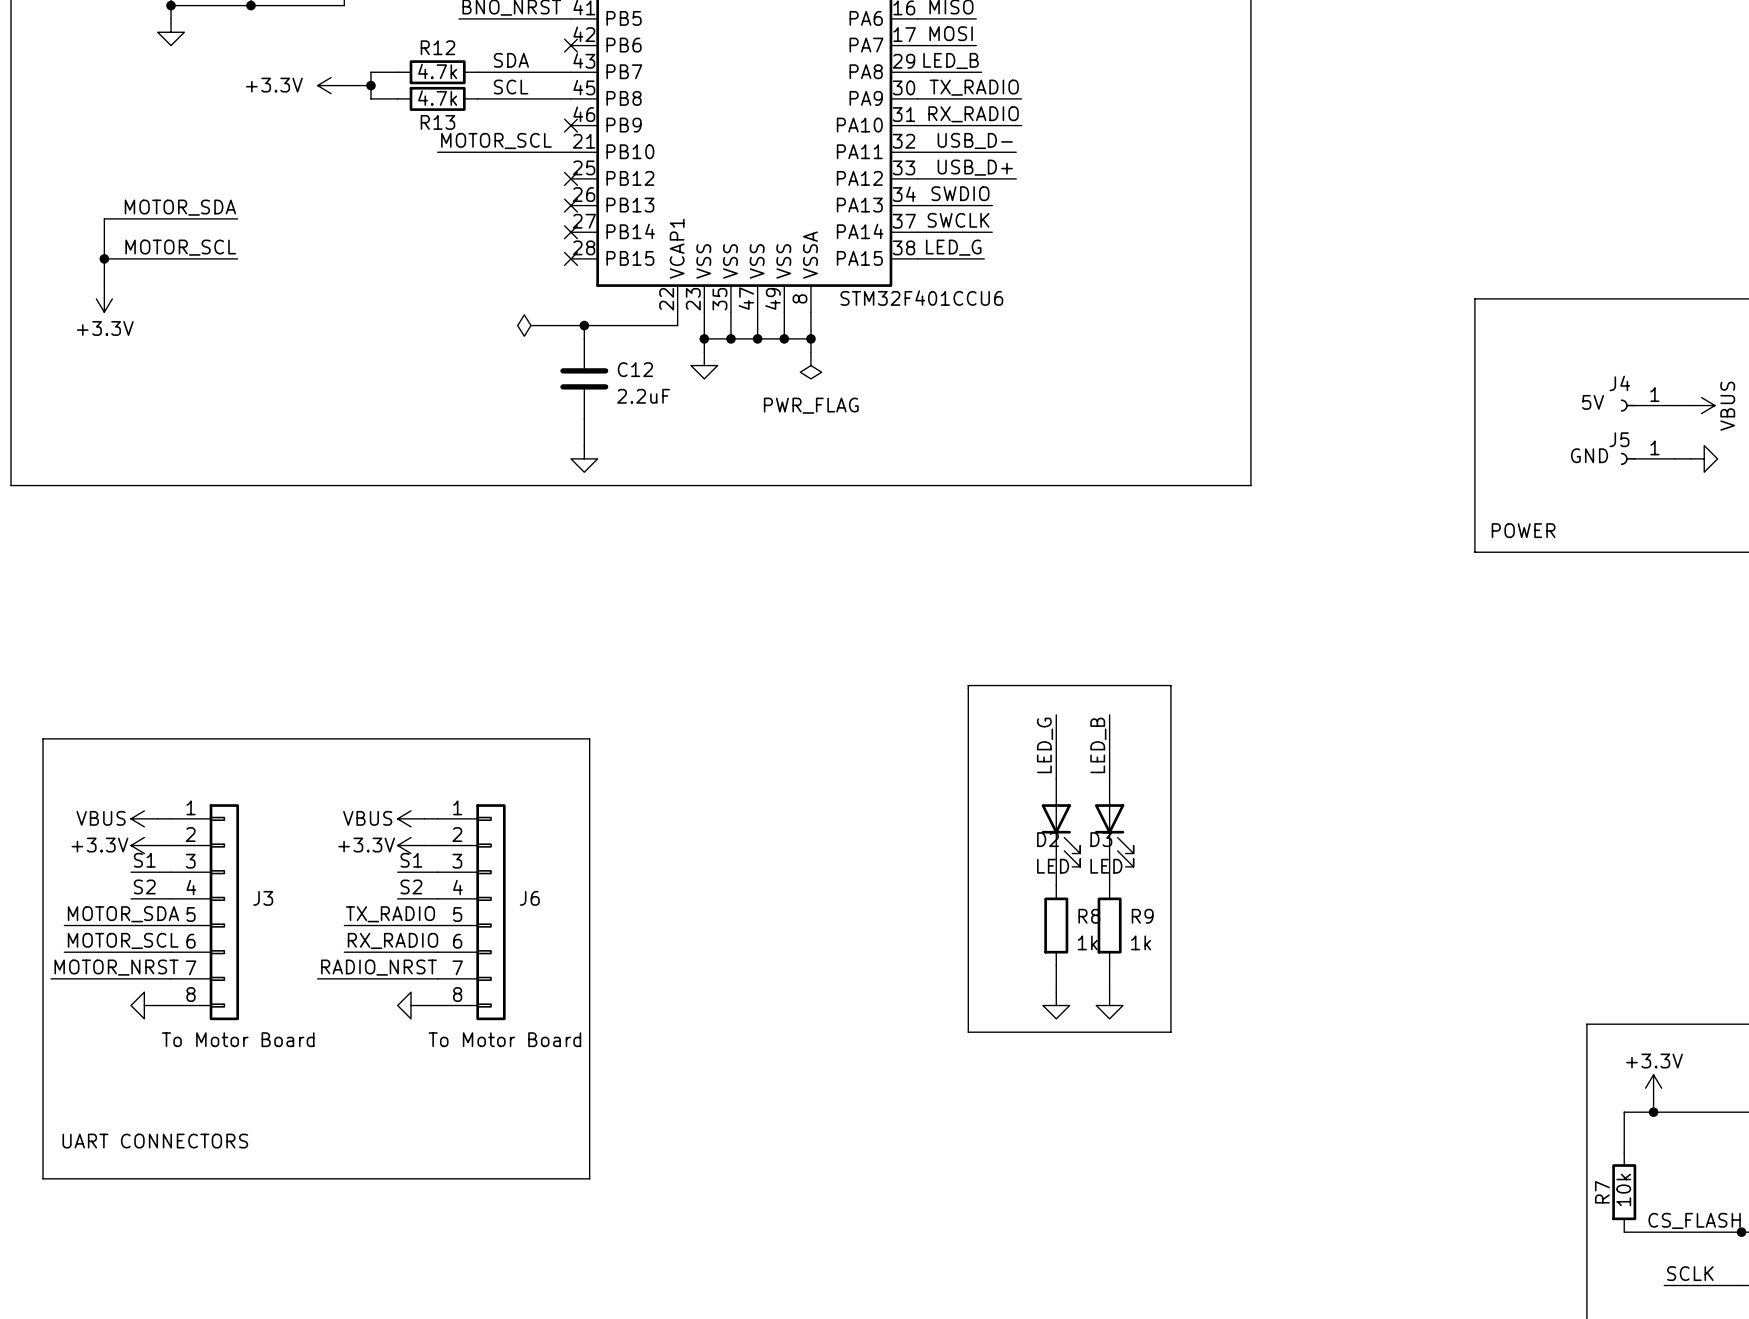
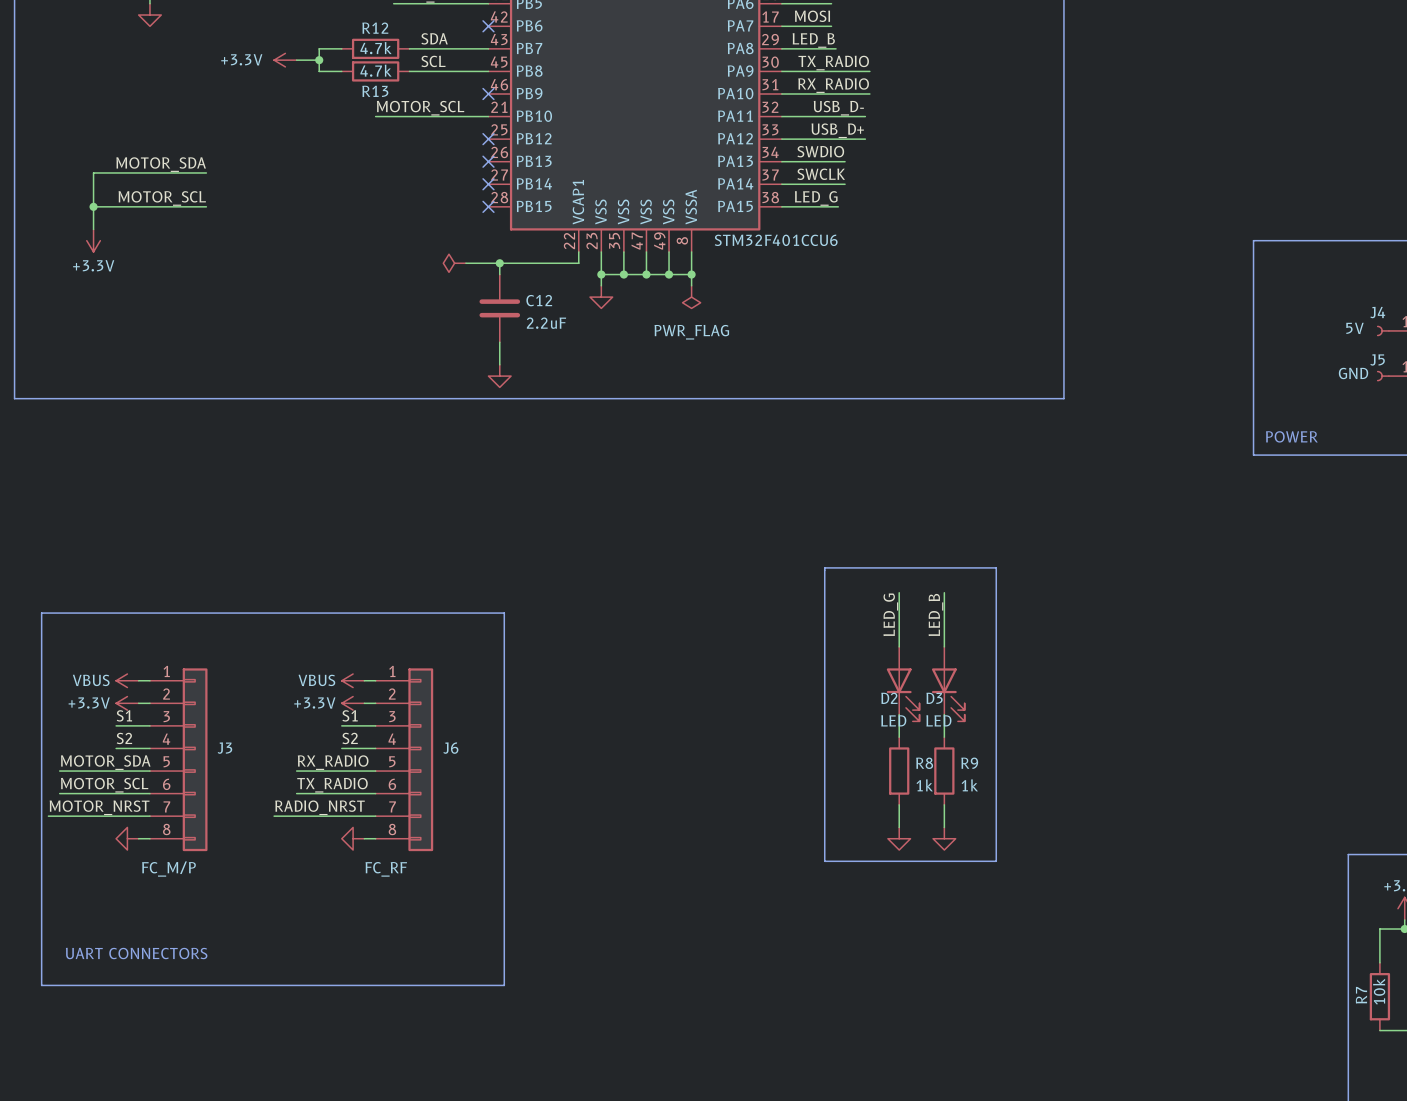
label: TX_RADIO (390, 914) -> RX_RADIO (333, 762)
label: RX_RADIO (393, 940) -> TX_RADIO (332, 785)
J3 value: To Motor Board (238, 1039) -> FC_M/P (168, 869)
J6 value: To Motor Board (504, 1039) -> FC_RF (386, 869)

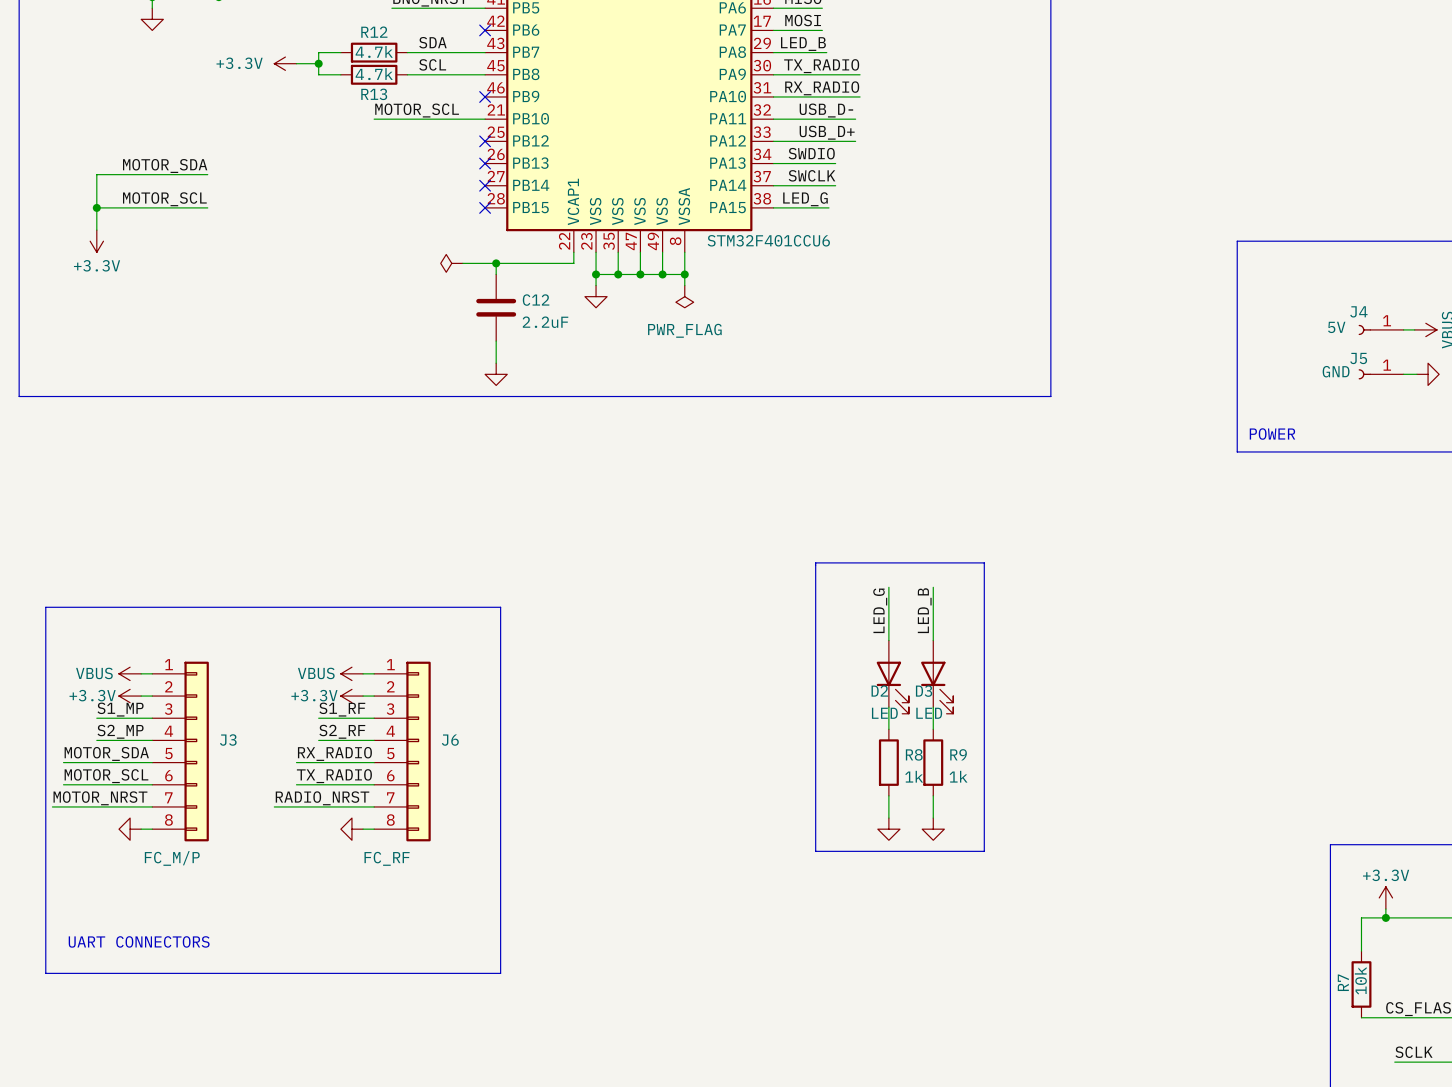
label: S1 (124, 715) -> none
label: S1 (350, 715) -> none
label: none -> S1_MP (120, 709)
label: none -> S1_RF (342, 709)
wire: none -> (96, 718) (119, 718)
wire: none -> (318, 718) (340, 718)
label: S2 (124, 738) -> none
label: S2 (350, 738) -> none
label: none -> S2_MP (120, 731)
label: none -> S2_RF (342, 731)
wire: none -> (96, 740) (119, 740)
wire: none -> (318, 740) (340, 740)

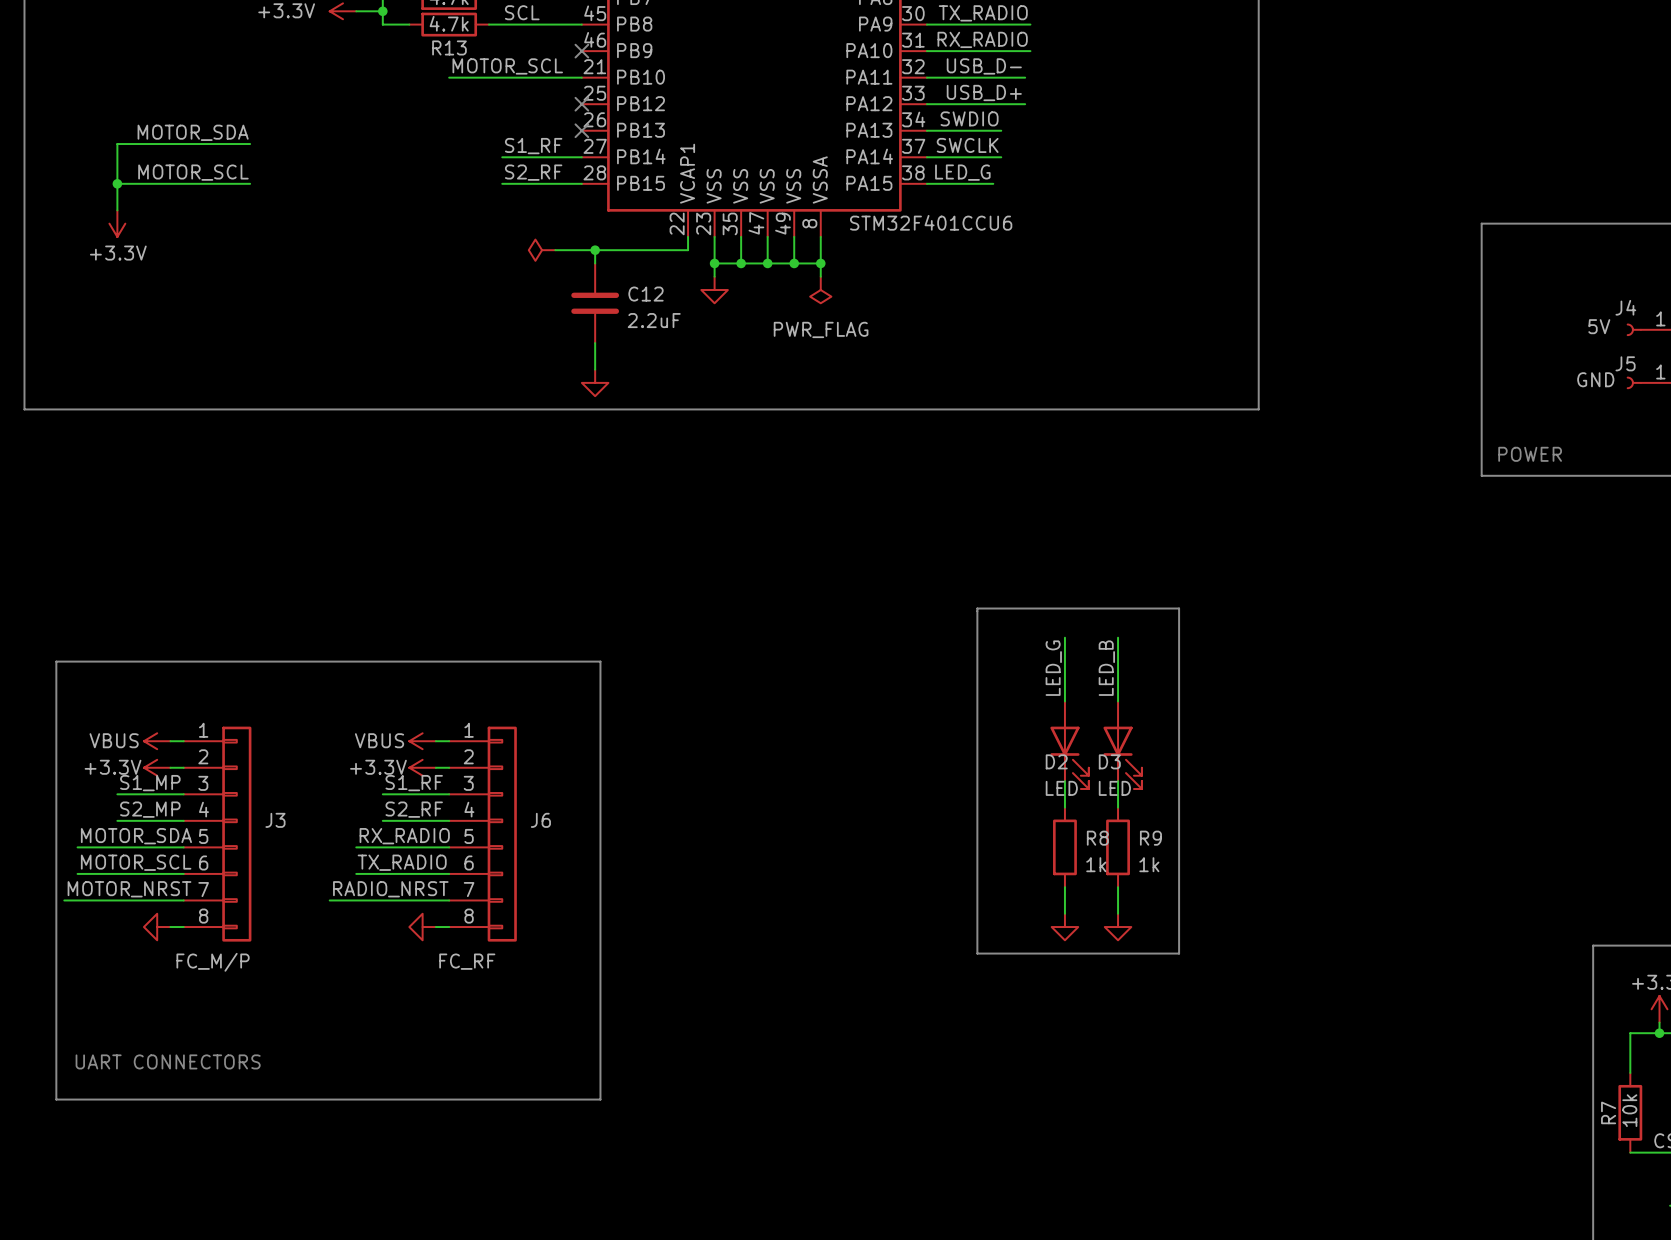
label: none -> S1_RF (533, 146)
wire: none -> (502, 157) (581, 157)
no-connect mark: (485, 185) -> none
label: none -> S2_RF (533, 172)
wire: none -> (502, 183) (581, 183)
no-connect mark: (485, 207) -> none

